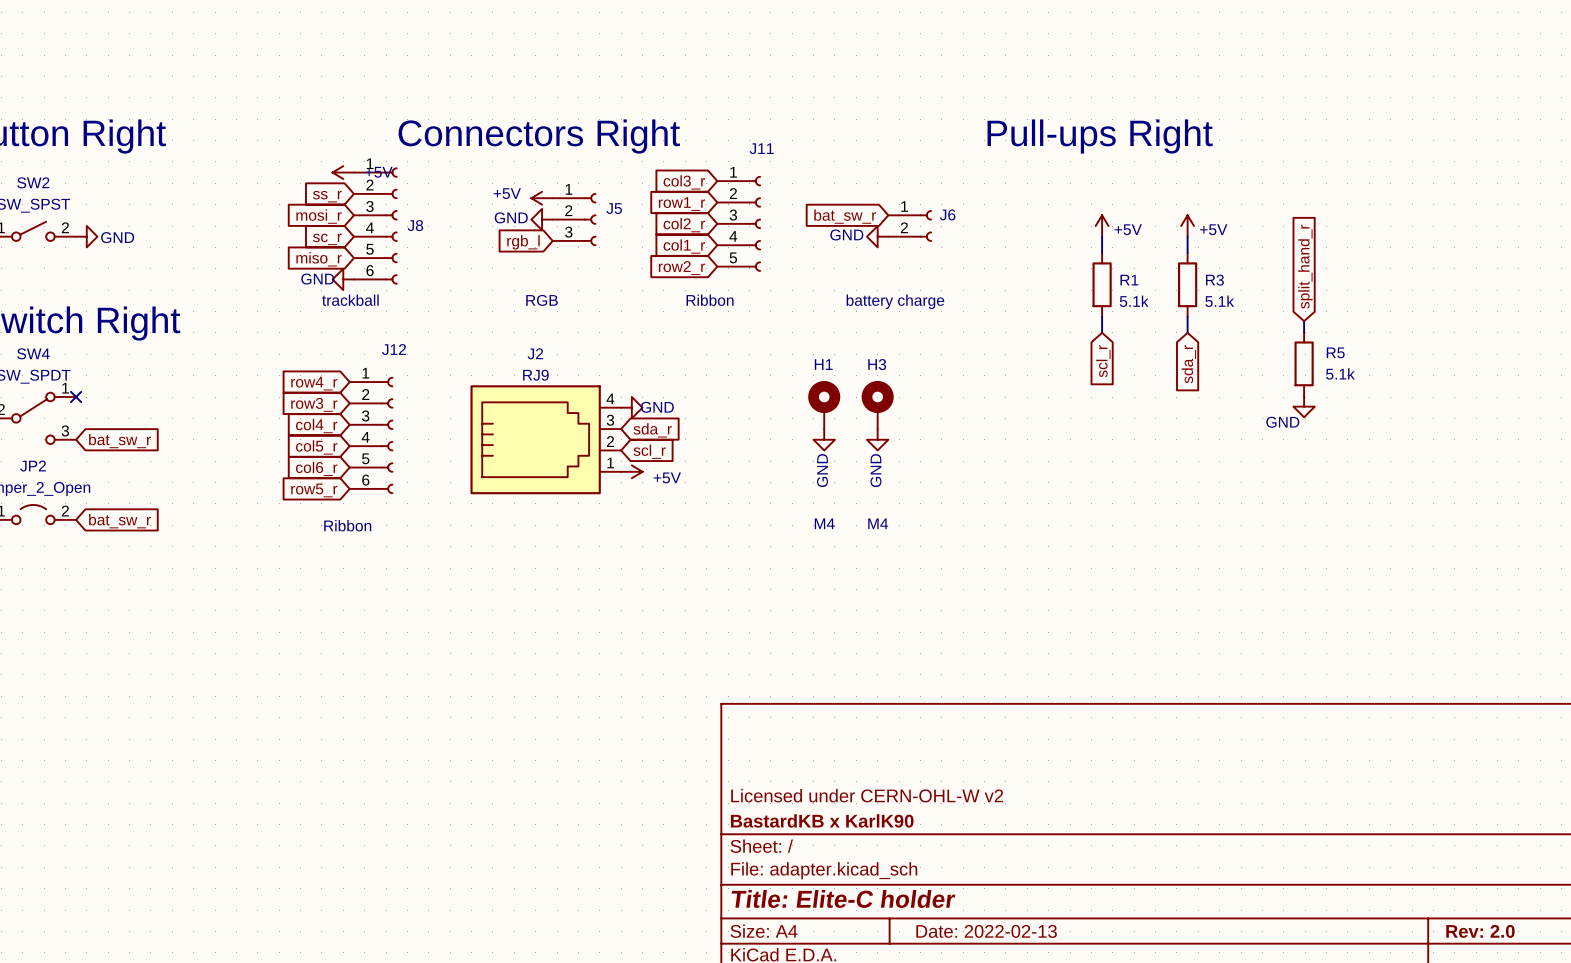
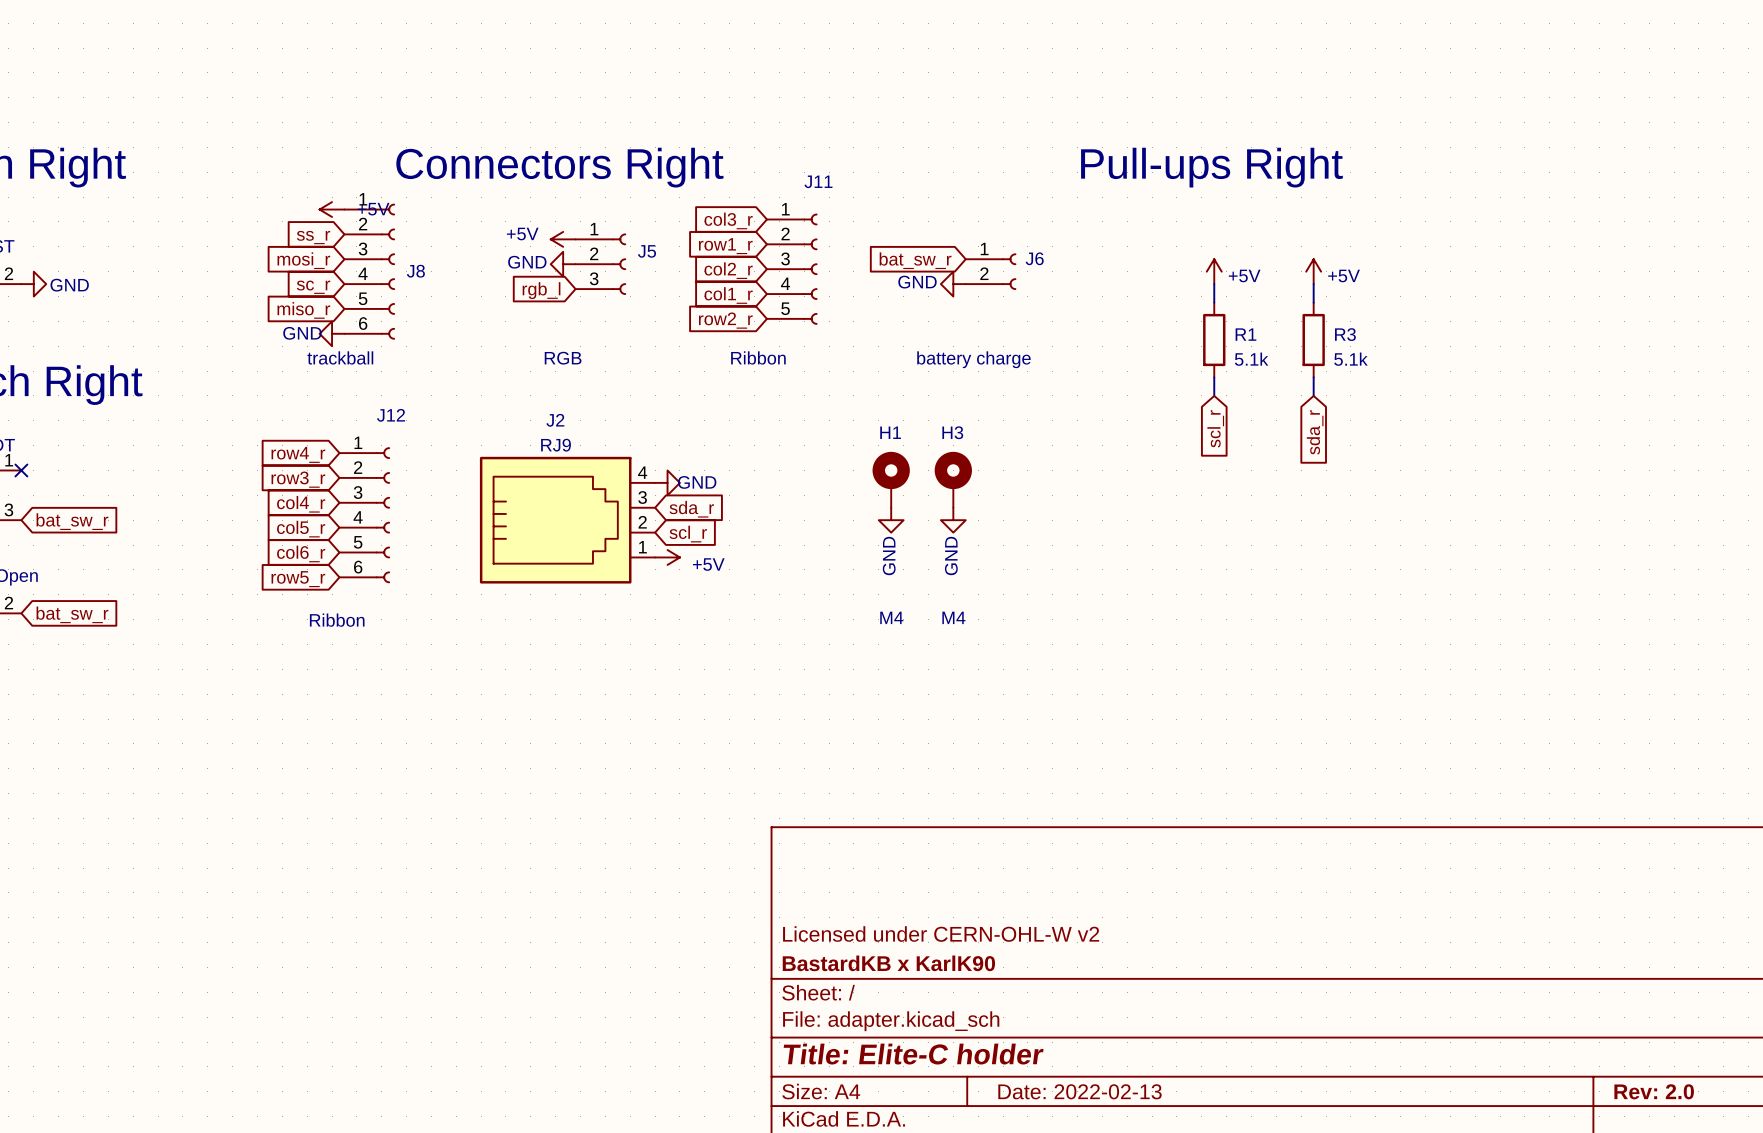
global label: split_hand_r (1305, 266) -> none
wire: (1304, 321) (1304, 331) -> none
R5: 5.1k (1304, 363) -> none
power symbol: GND (1304, 406) -> none

